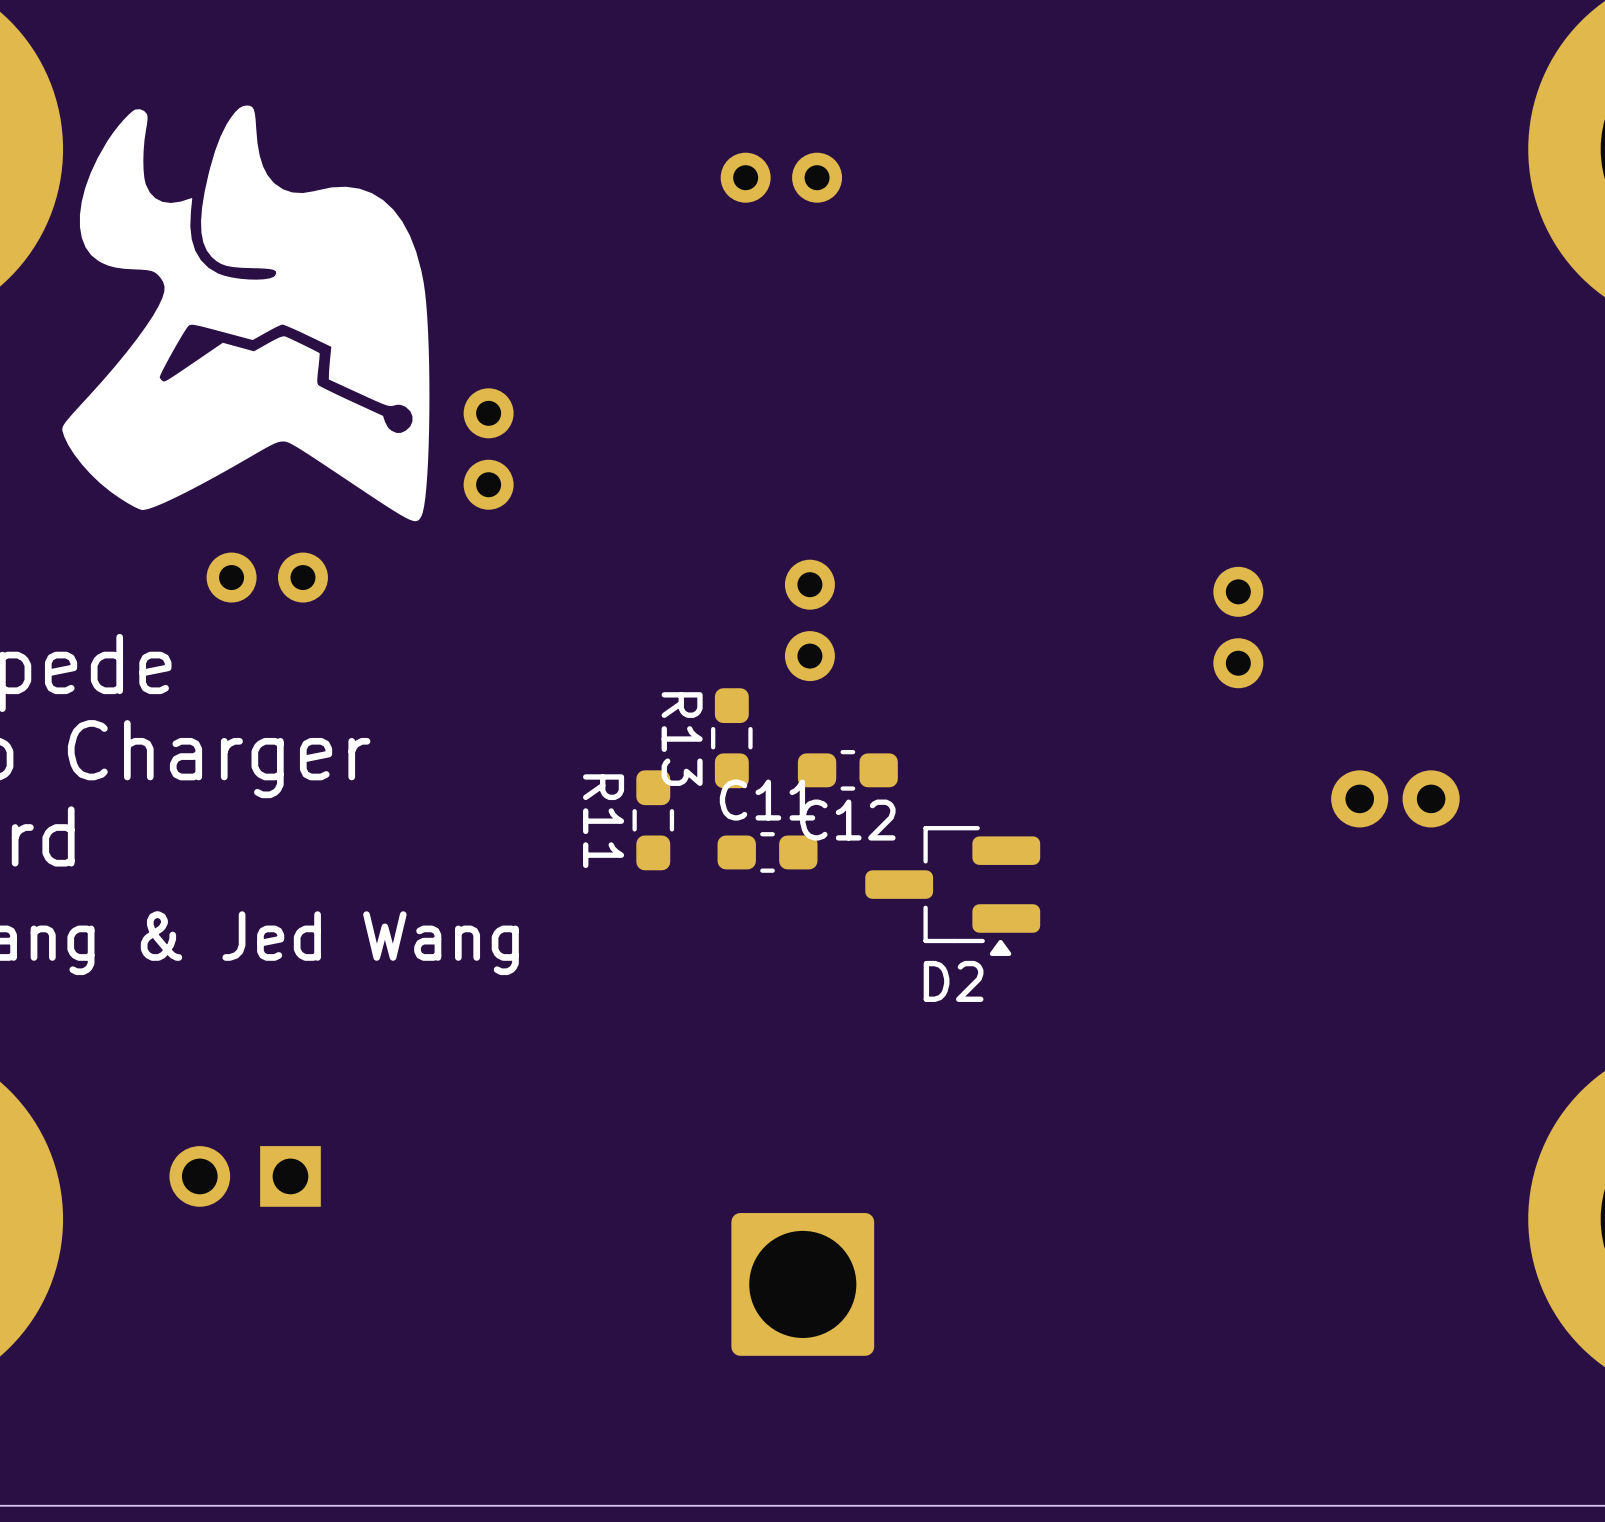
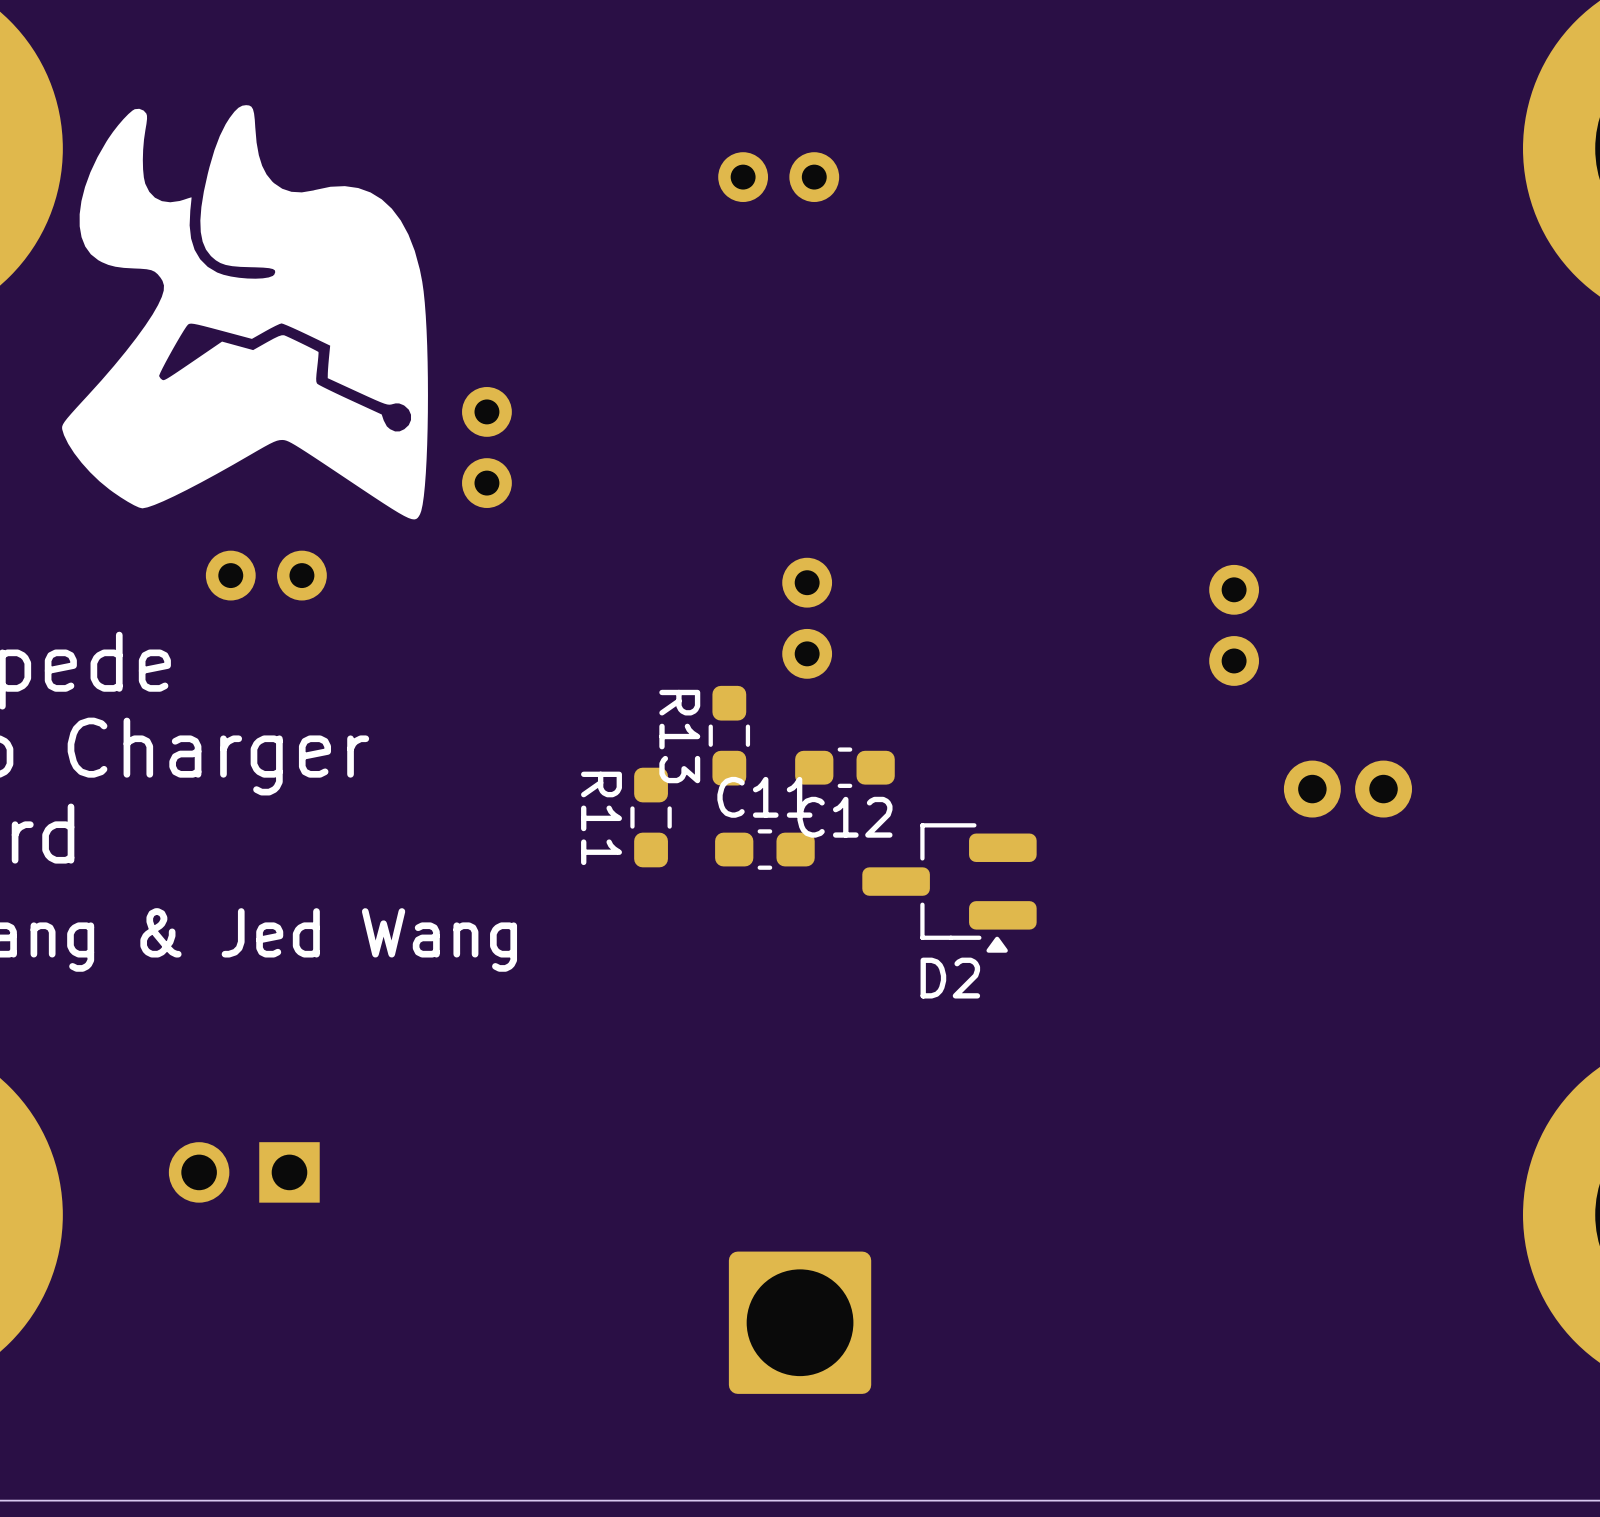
part position: (1395, 798) -> (1347, 789)
part position: (802, 1284) -> (800, 1322)

